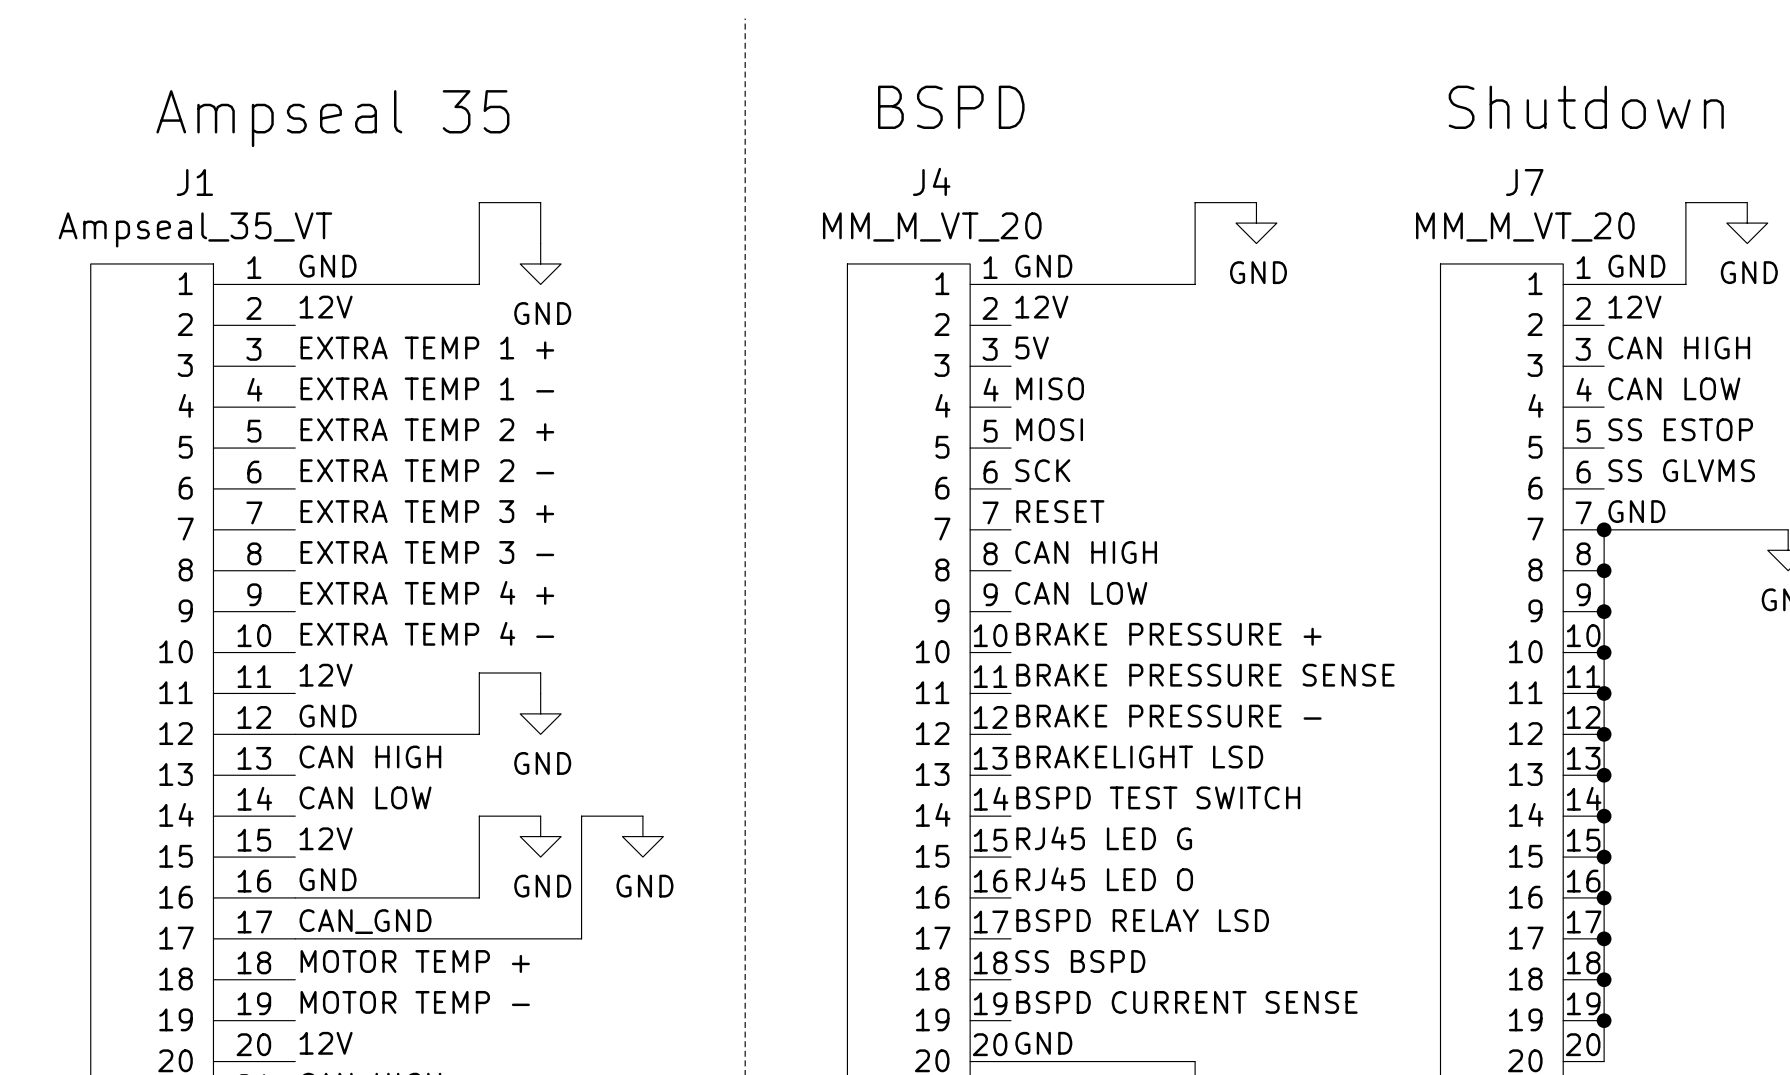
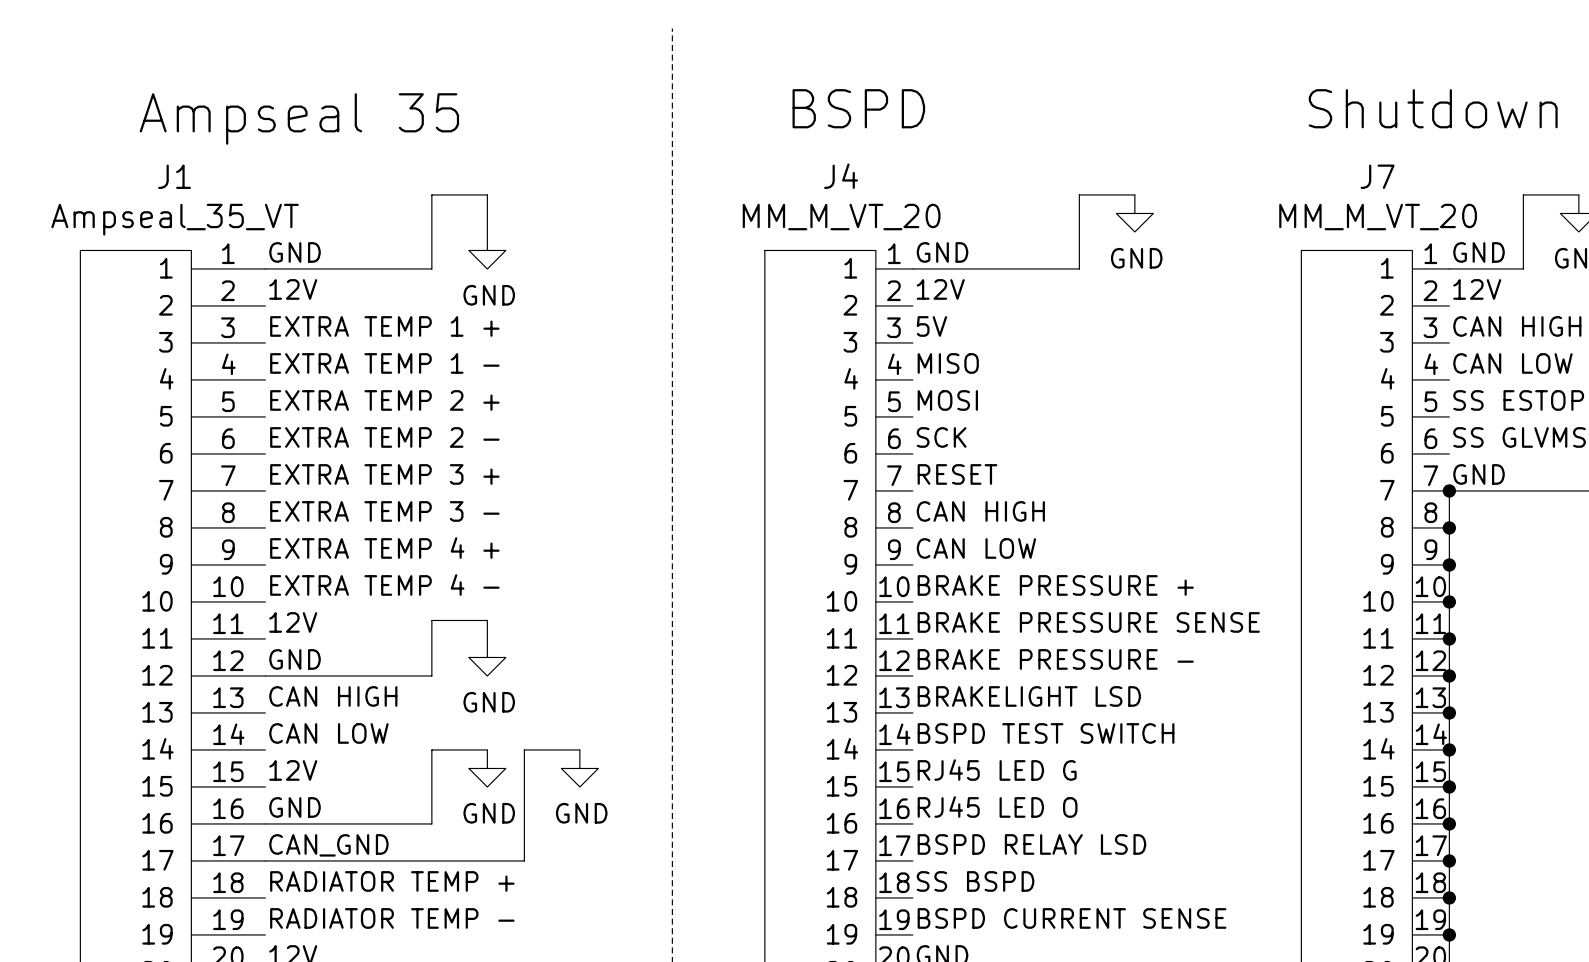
label: MOTOR TEMP + (415, 961) -> RADIATOR TEMP + (392, 881)
label: MOTOR TEMP - (415, 1002) -> RADIATOR TEMP - (392, 918)

